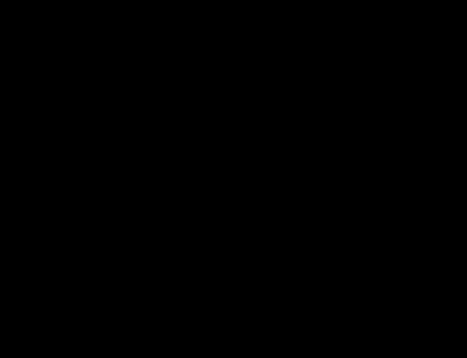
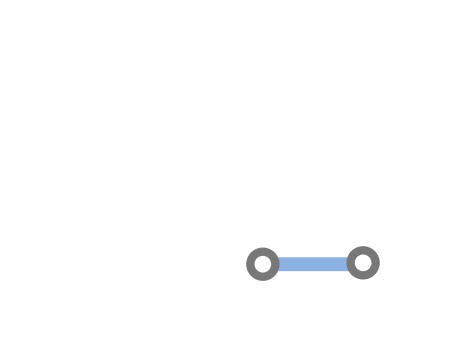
track: none -> (363, 262) (262, 264)
via: none -> (363, 262)
via: none -> (262, 264)

